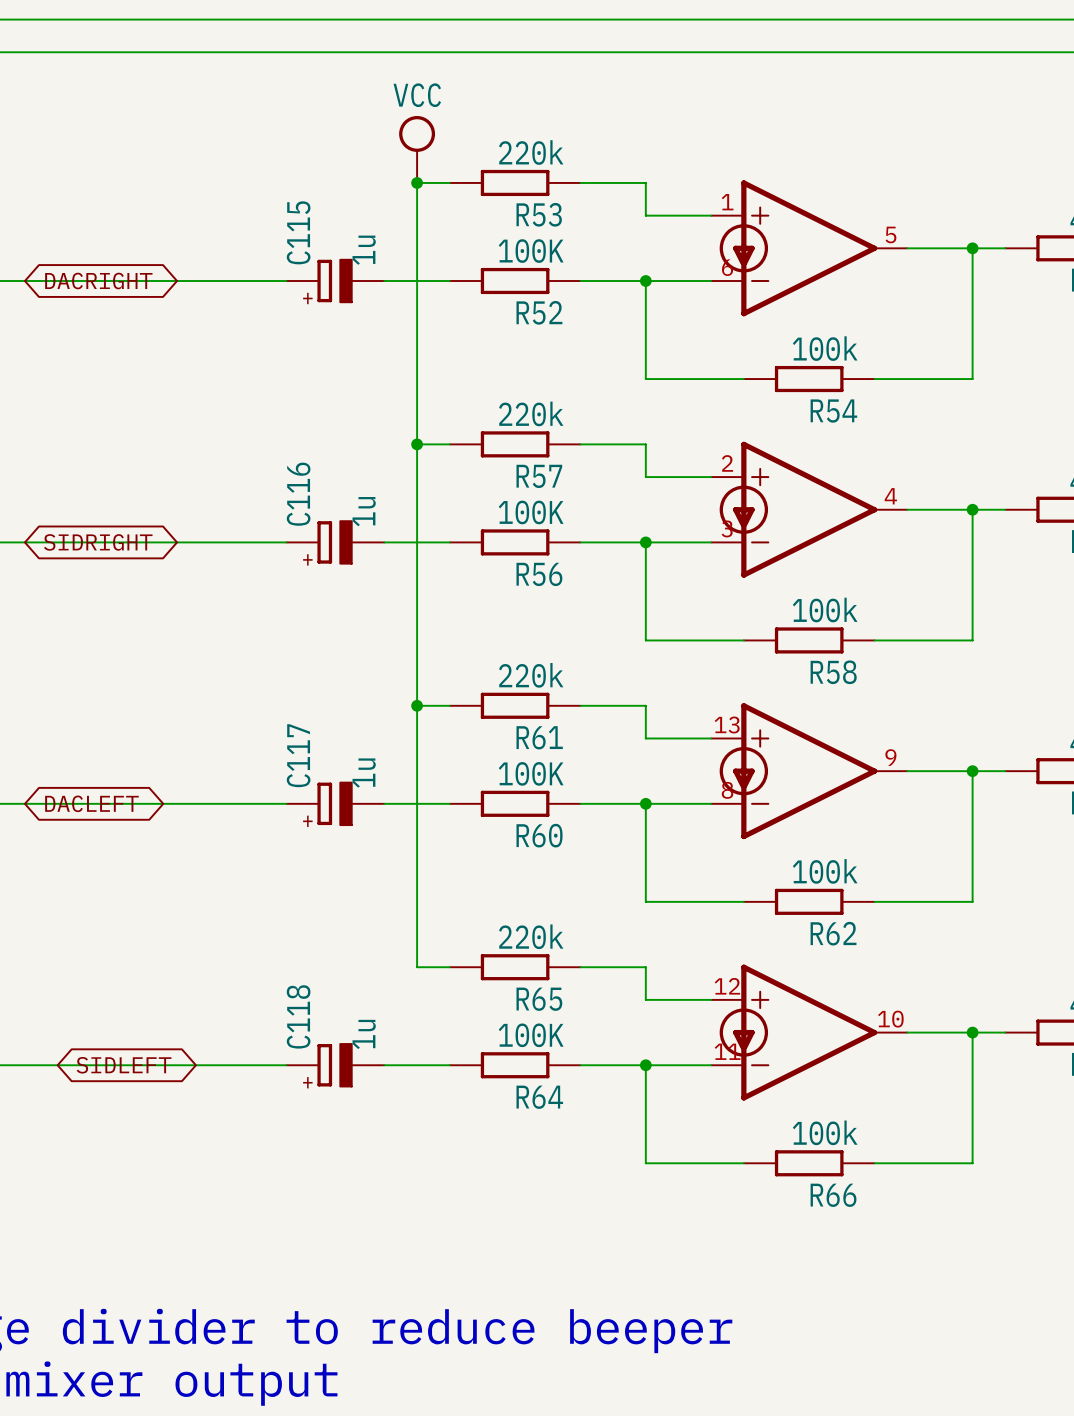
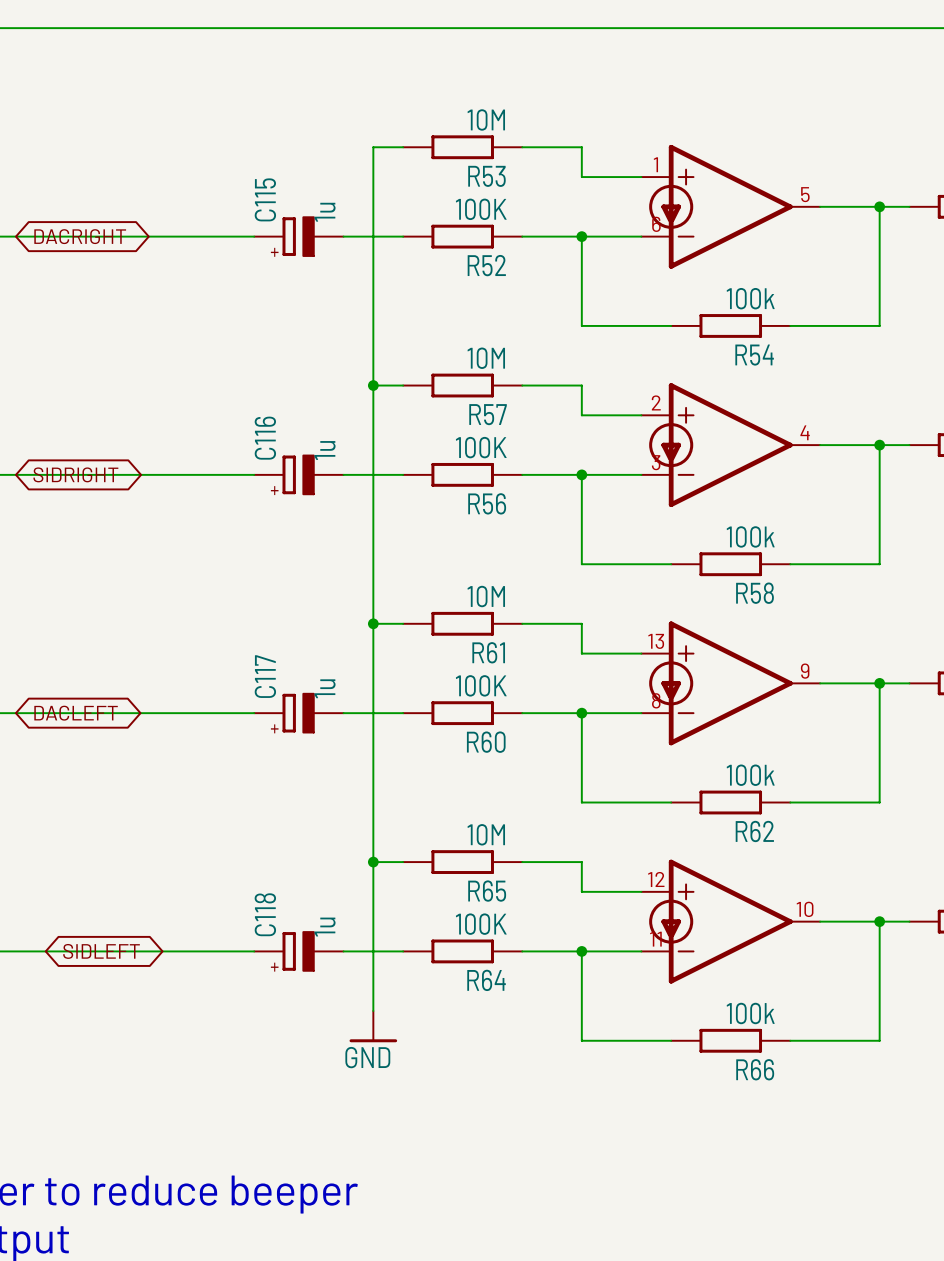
power symbol: VCC (417, 149) -> none
R53 value: 220k (531, 152) -> 10M (486, 119)
junction: (417, 182) -> none
R57 value: 220k (531, 413) -> 10M (486, 358)
R61 value: 220k (531, 675) -> 10M (486, 596)
R65 value: 220k (531, 936) -> 10M (486, 834)
wire: none -> (373, 862) (373, 1010)
junction: none -> (373, 862)
power symbol: none -> GND (373, 1026)

